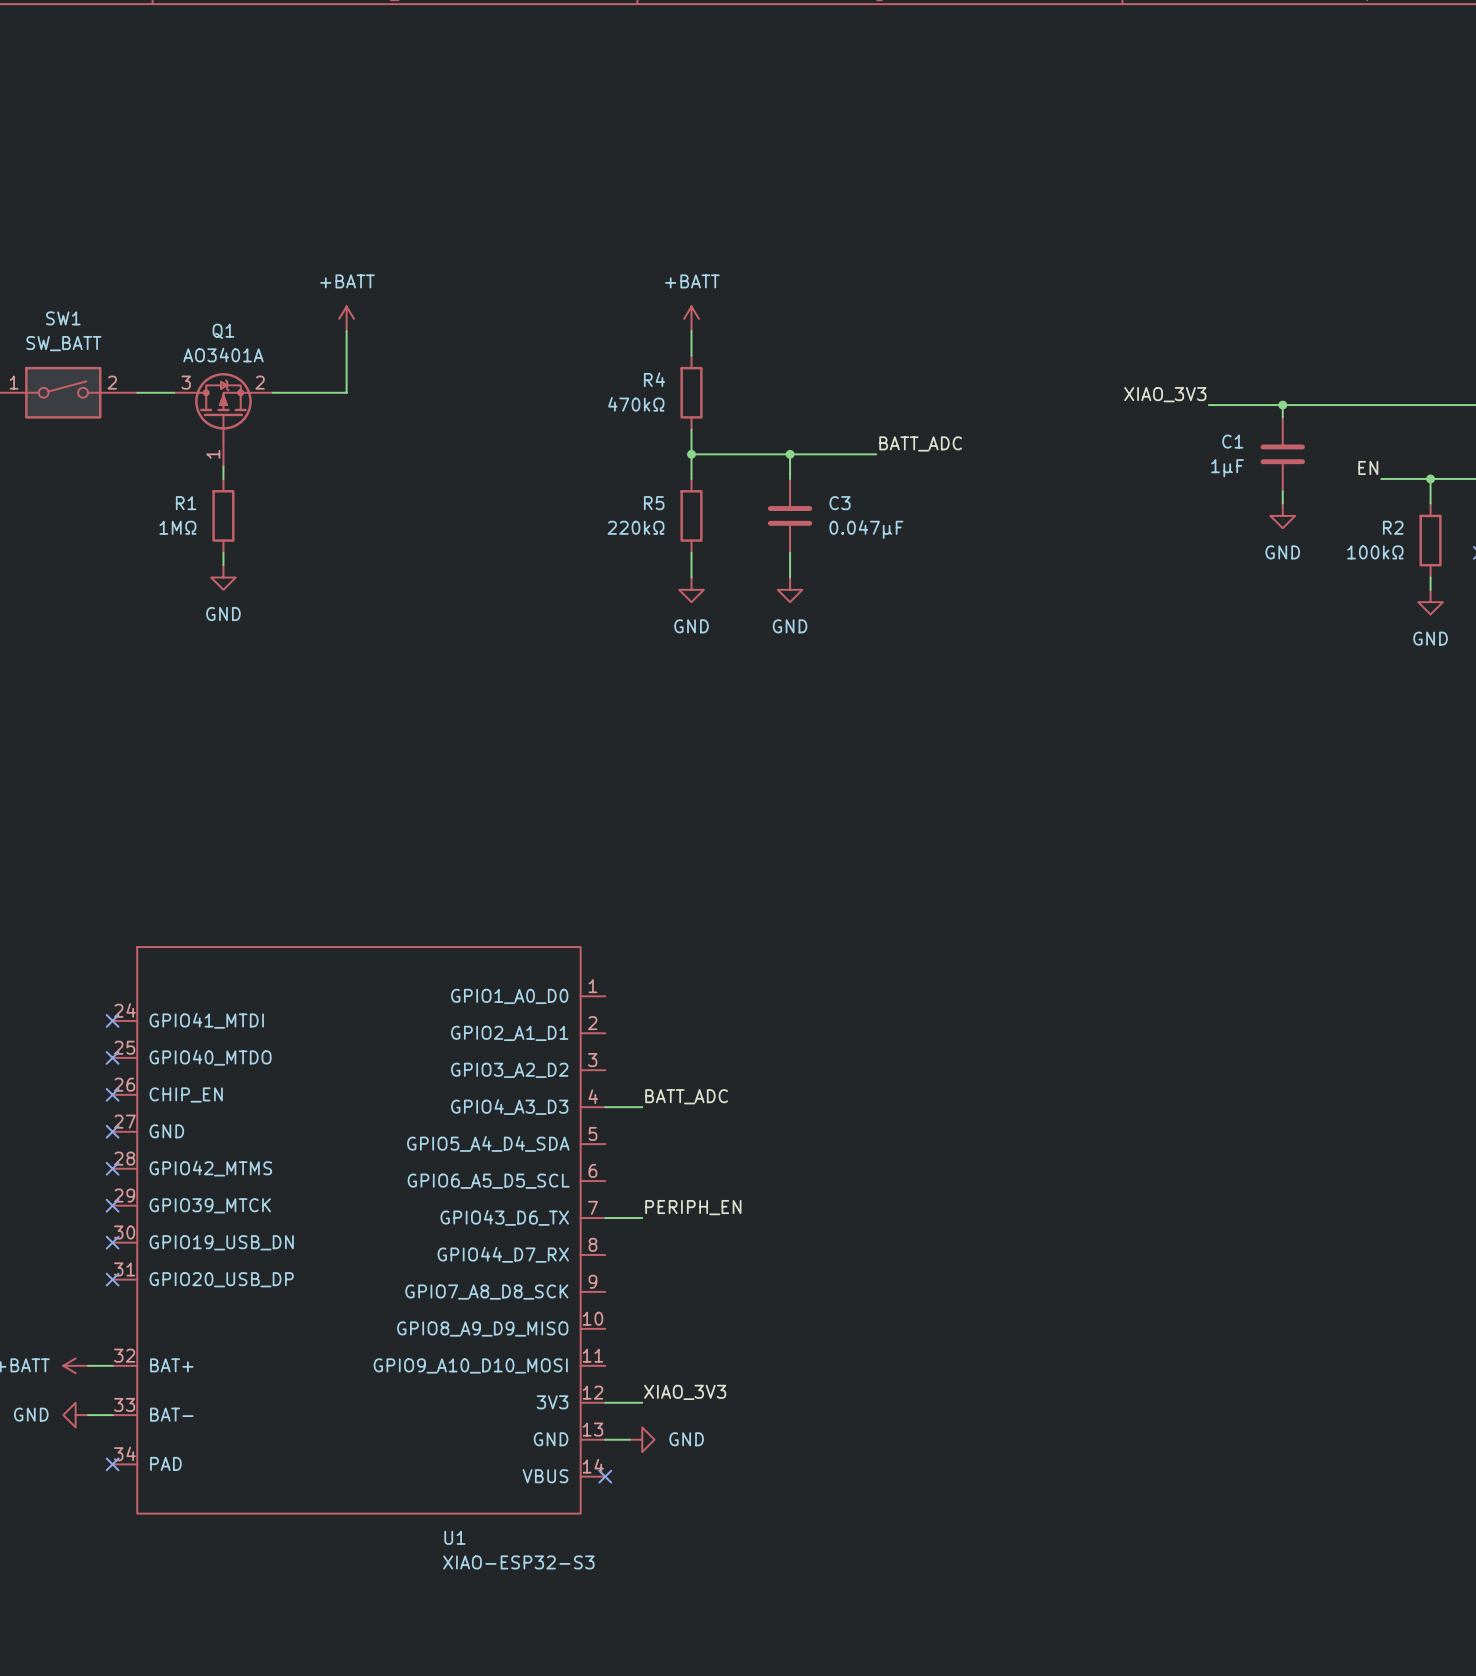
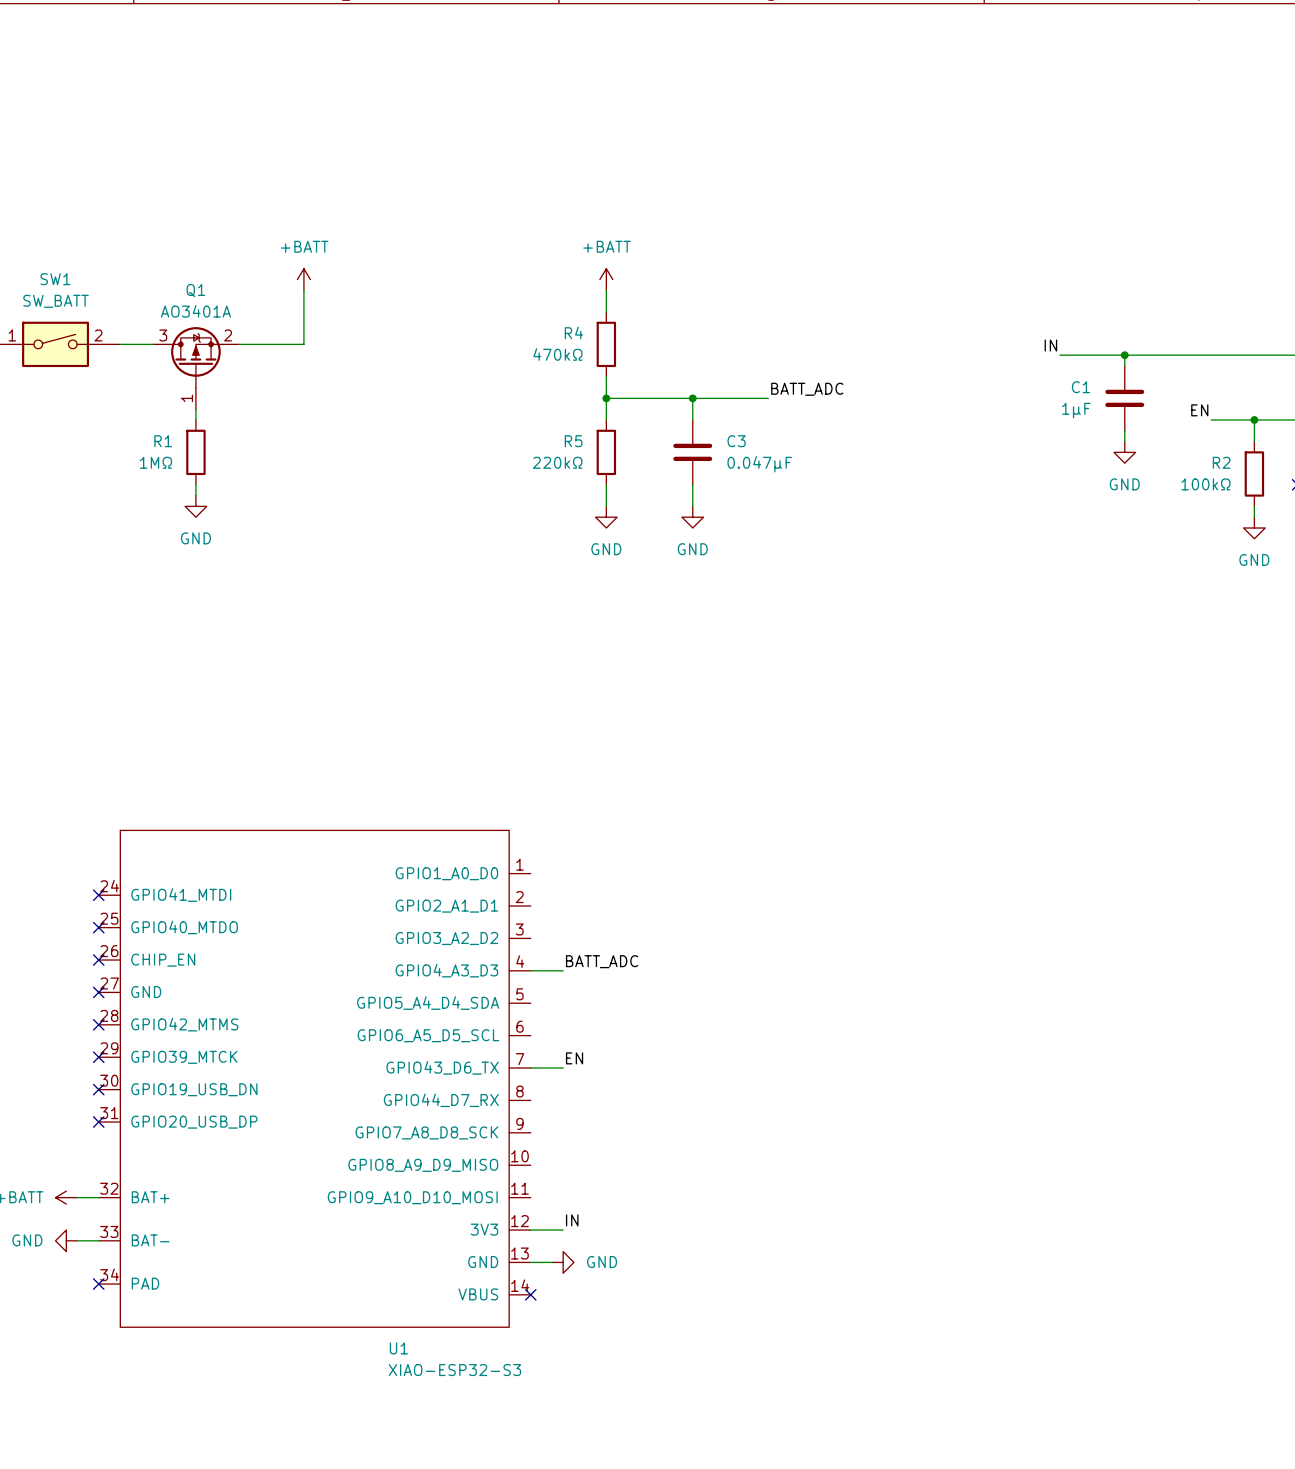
label: XIAO_3V3 (1165, 394) -> IN (1050, 345)
label: PERIPH_EN (693, 1207) -> EN (574, 1058)
label: XIAO_3V3 (685, 1392) -> IN (572, 1220)

